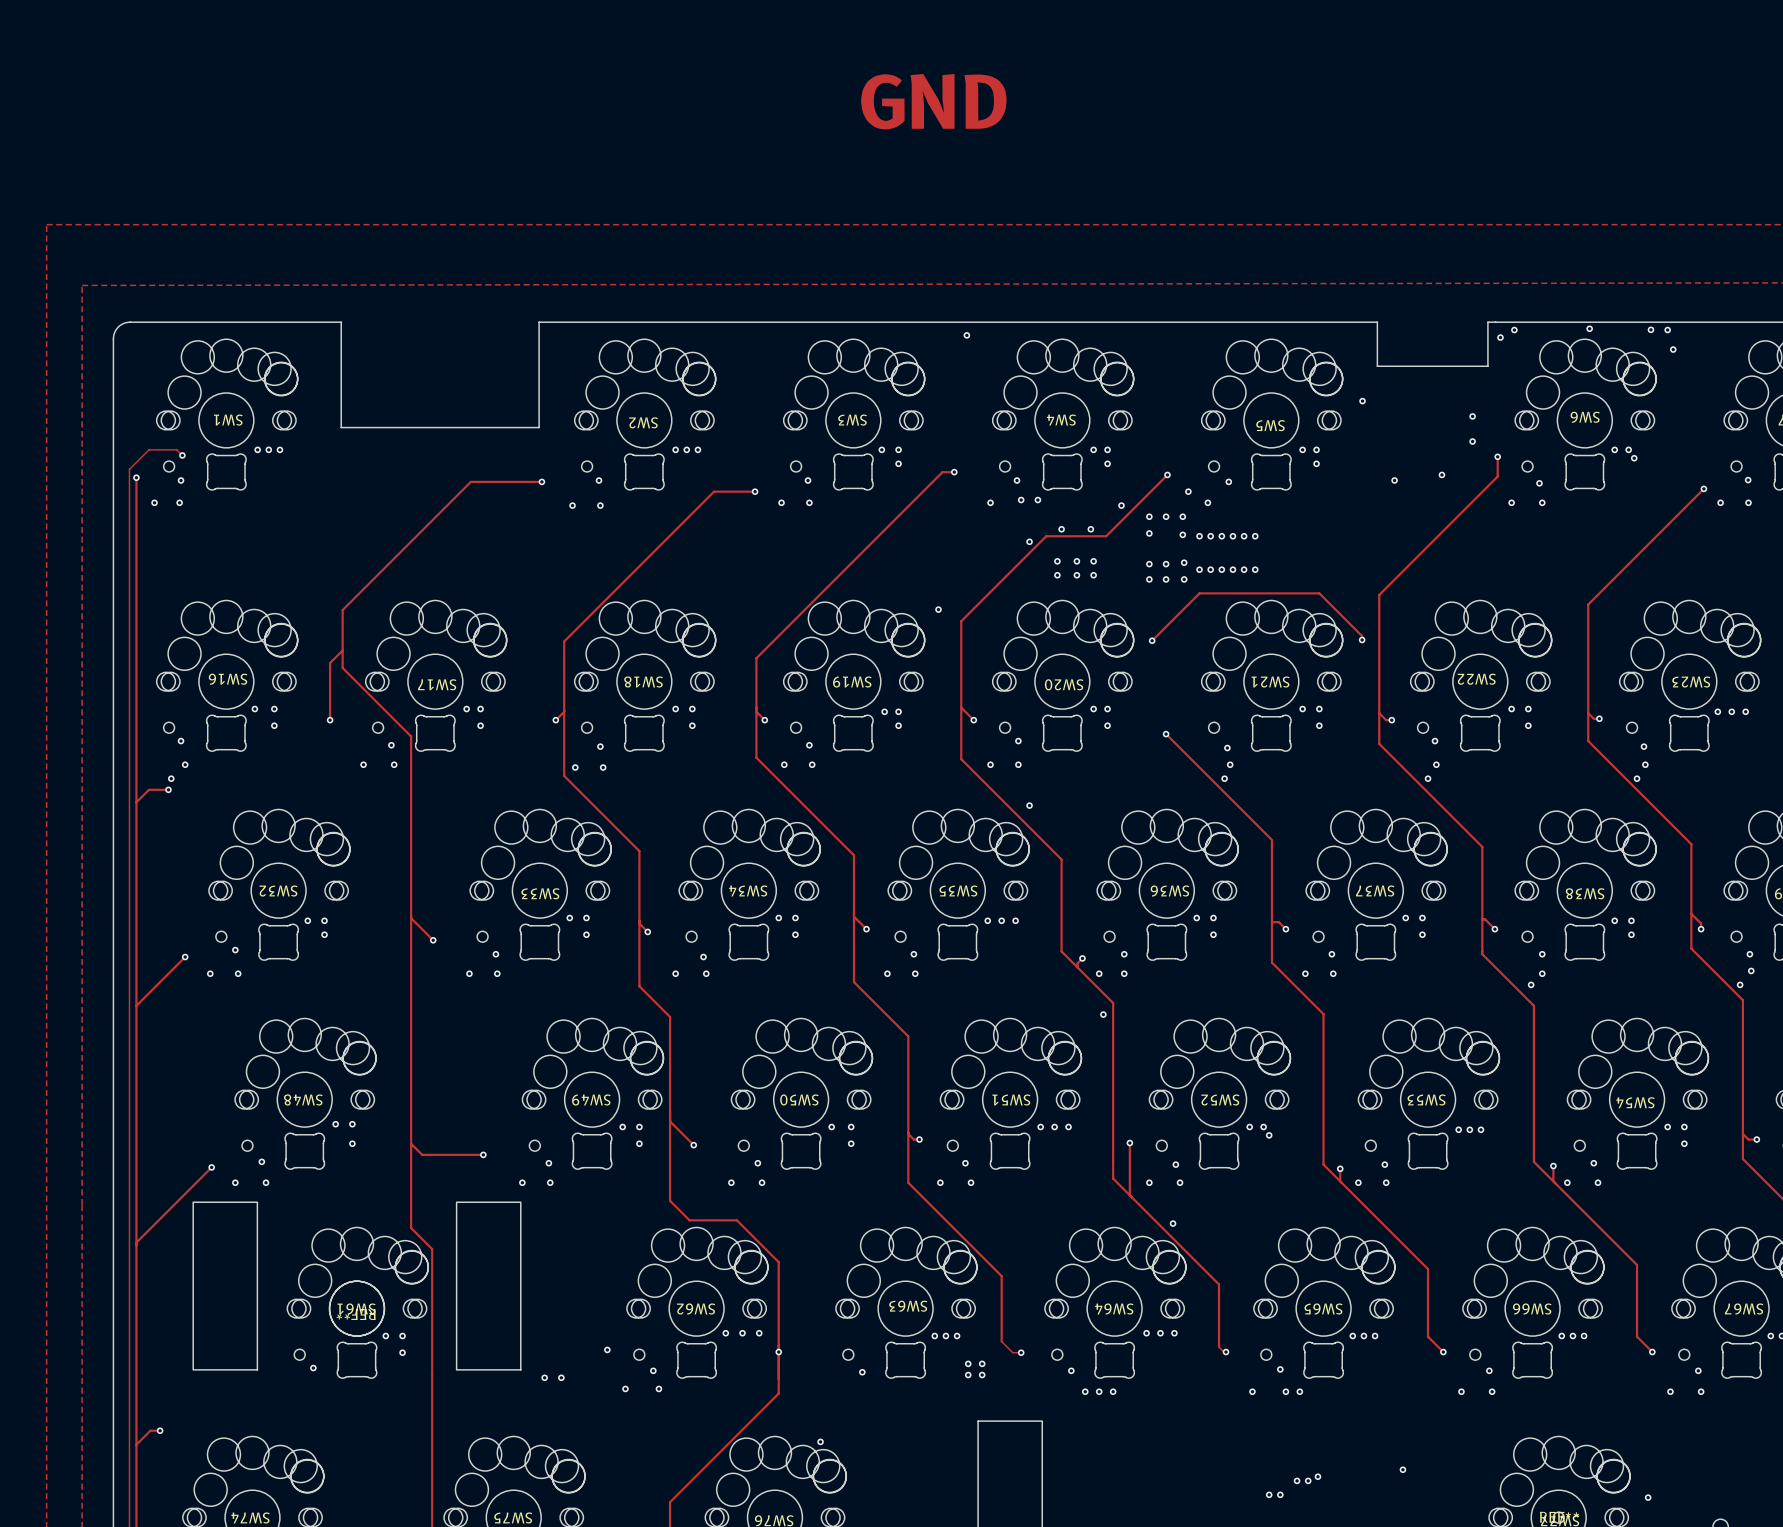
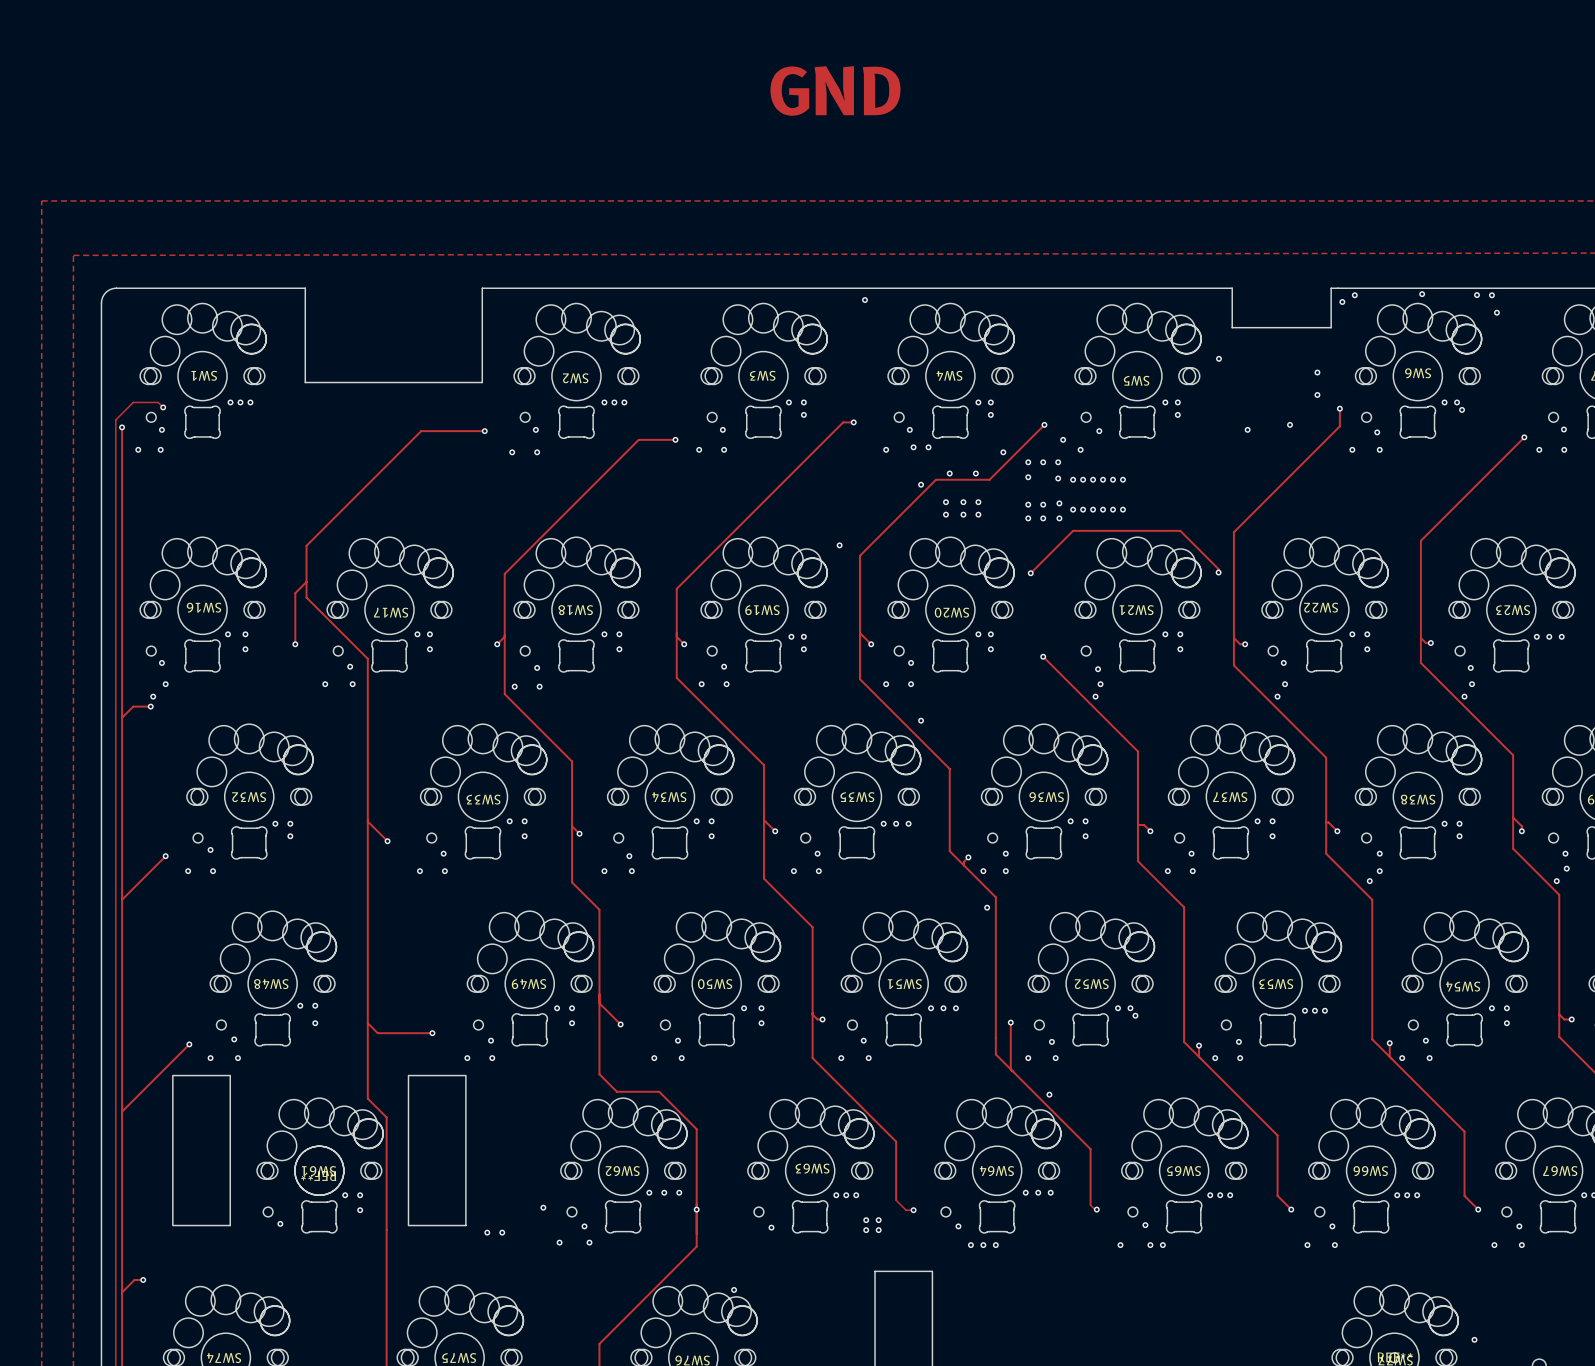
via: (1402, 1469) -> none
via: (1317, 1476) -> none
via: (1297, 1480) -> none
via: (1308, 1480) -> none
via: (1269, 1494) -> none
via: (1280, 1494) -> none

